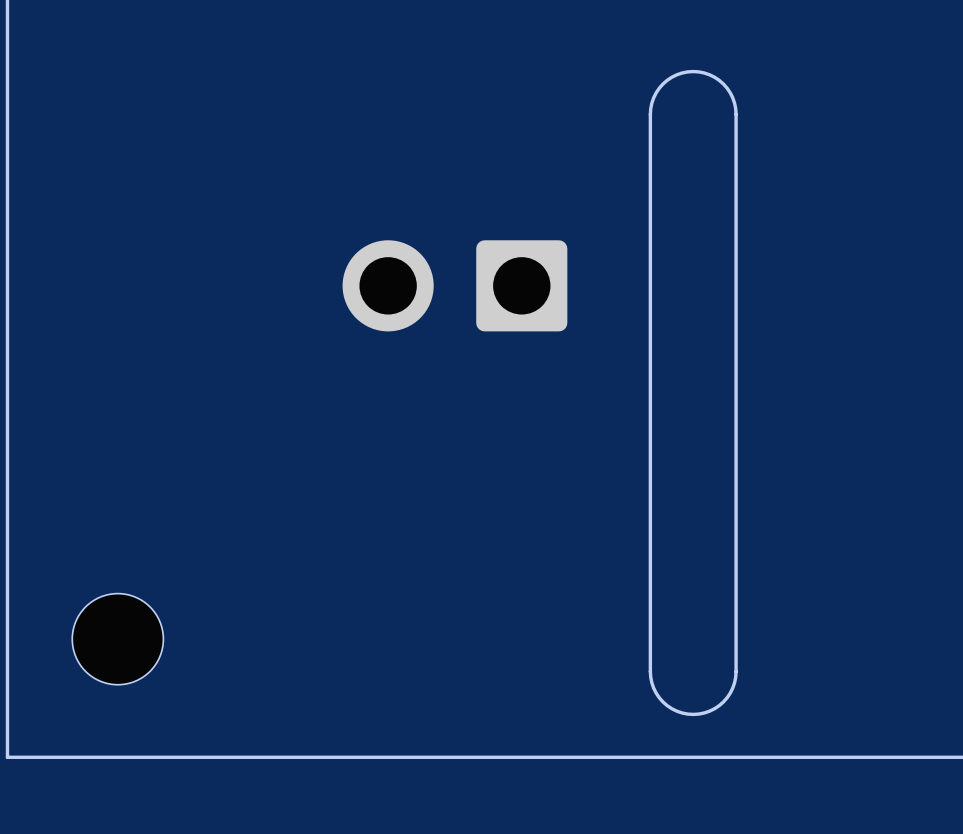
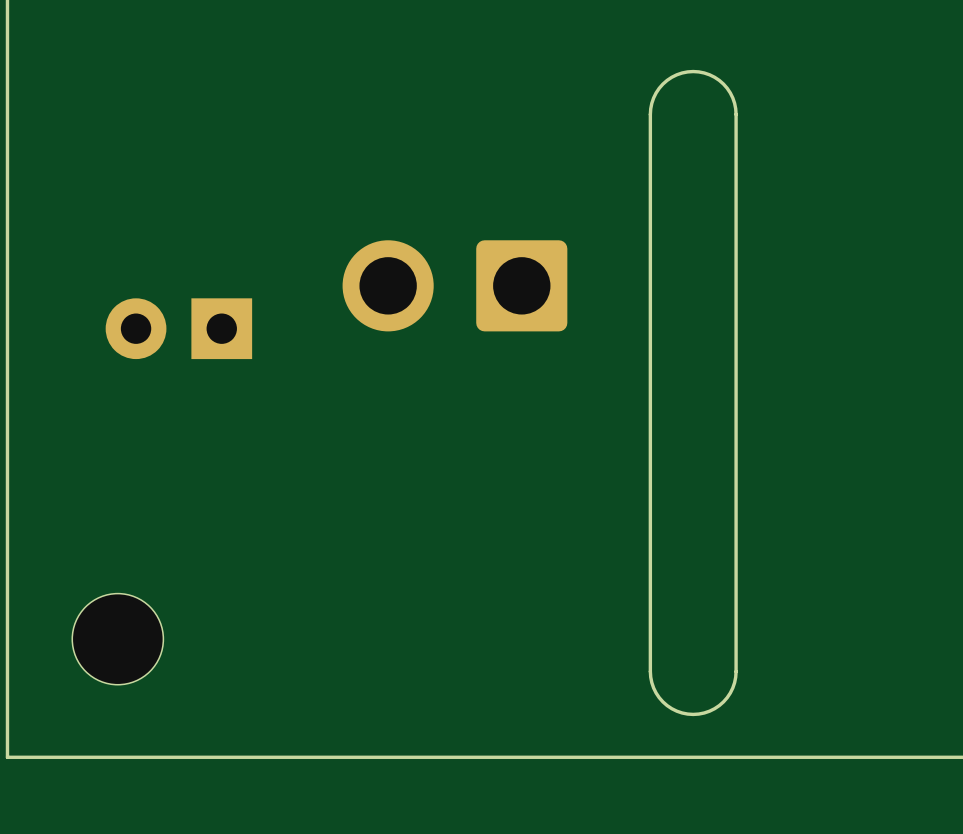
part: none -> (178, 328)

